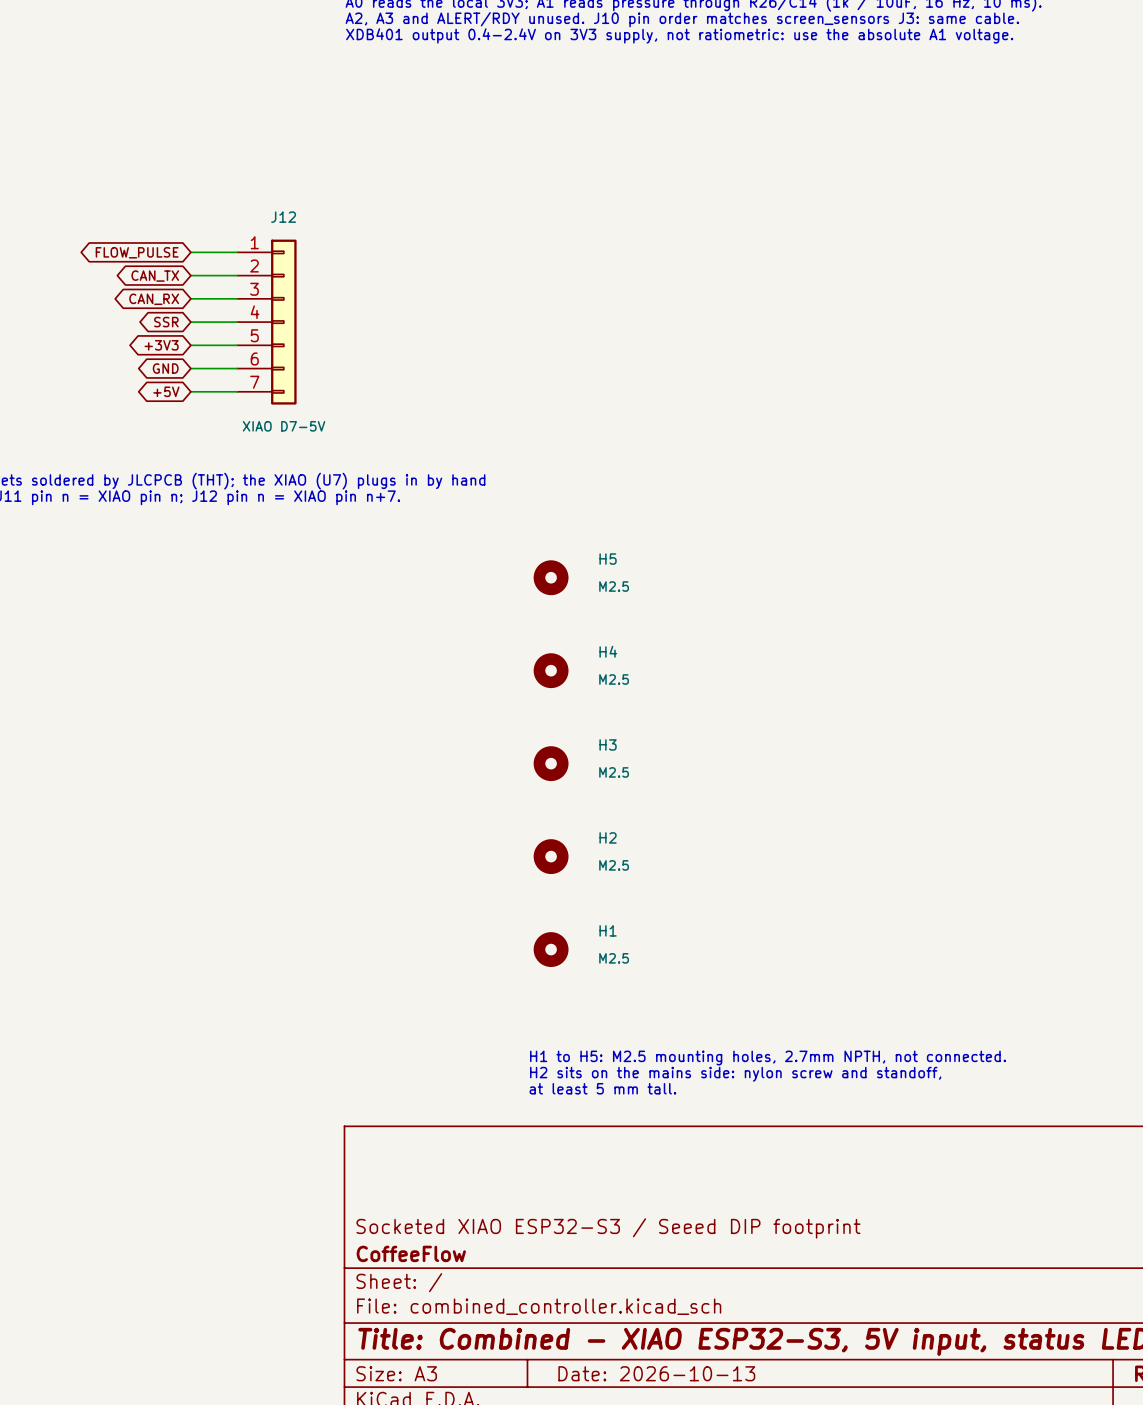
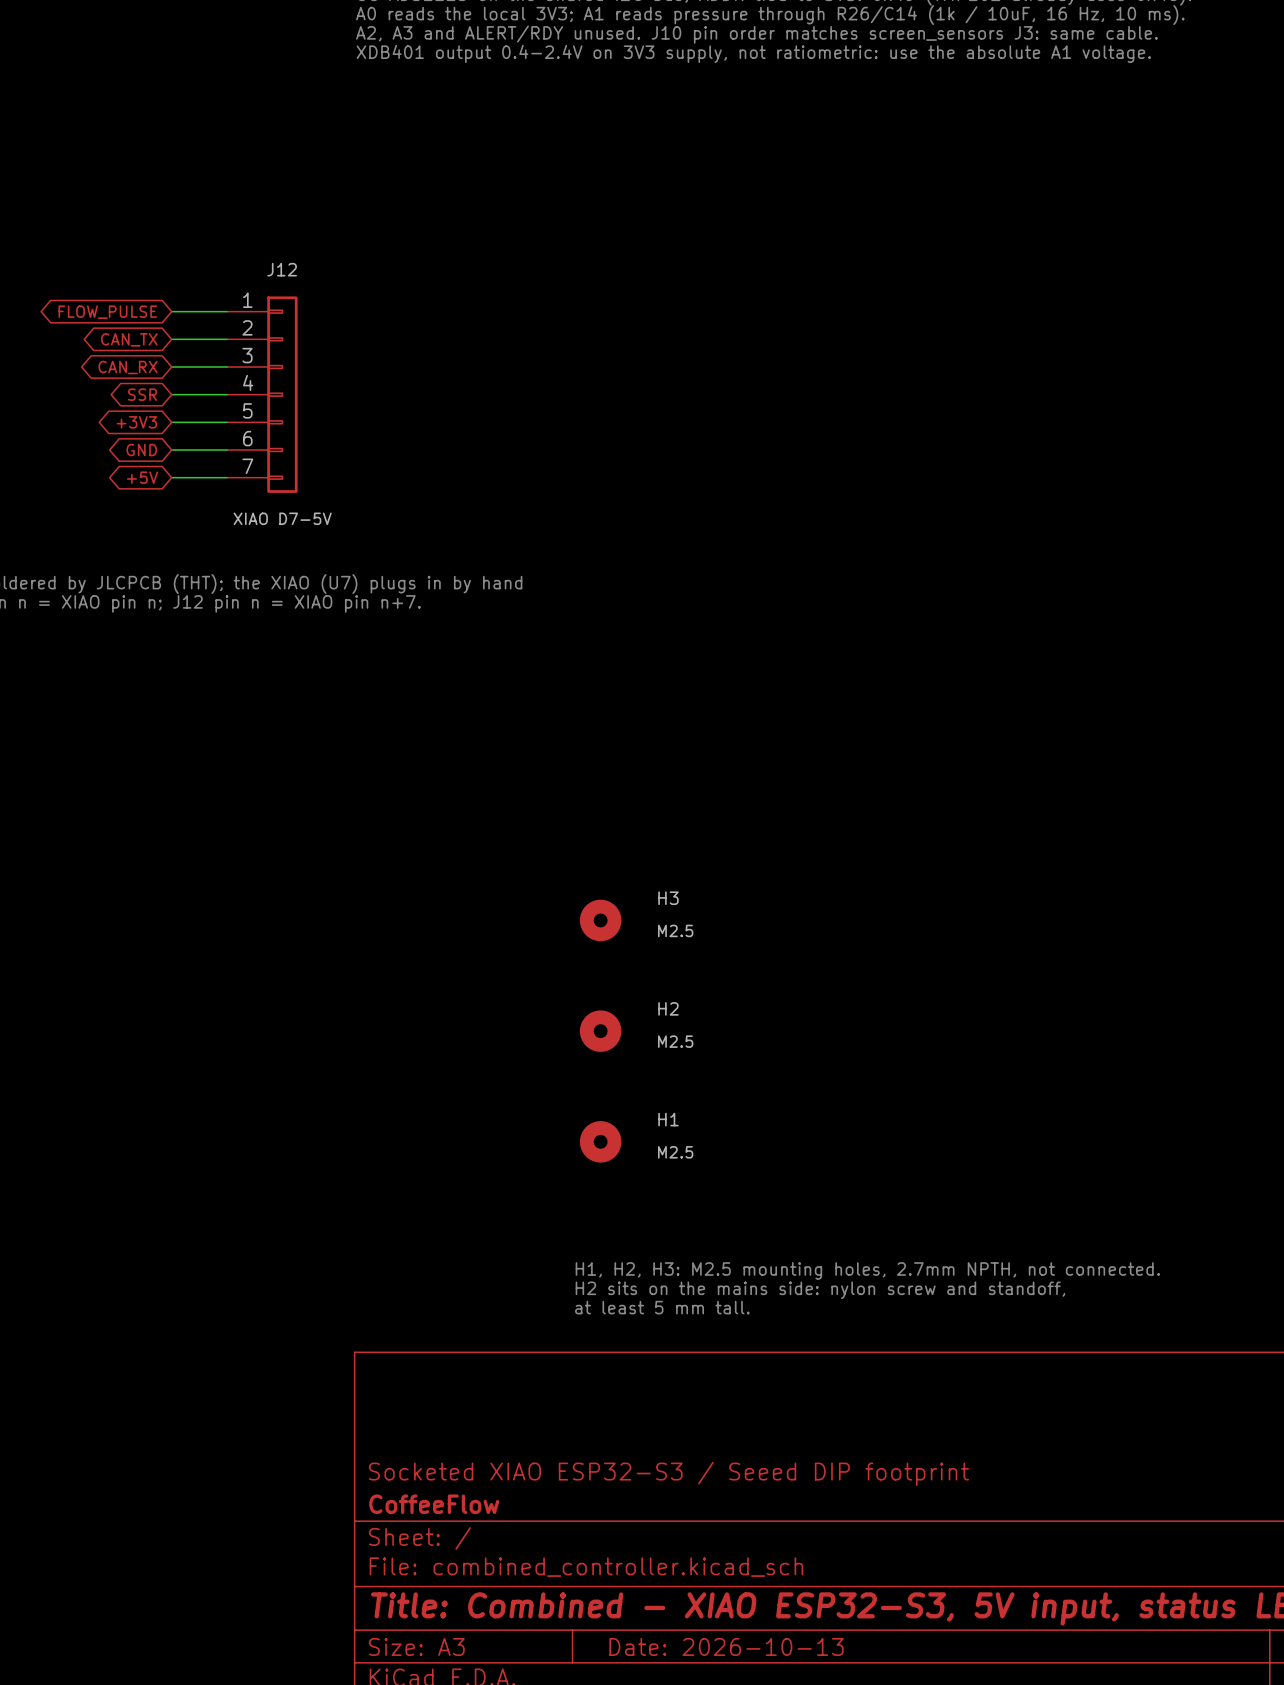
H5: M2.5 (551, 577) -> none
H4: M2.5 (551, 670) -> none
text: H1 to H5: M2.5 mounting holes, 2.7mm NPTH, not connected. (768, 1058) -> H1, H2, H3: M2.5 mounting holes, 2.7mm NPTH, not connected. (867, 1271)

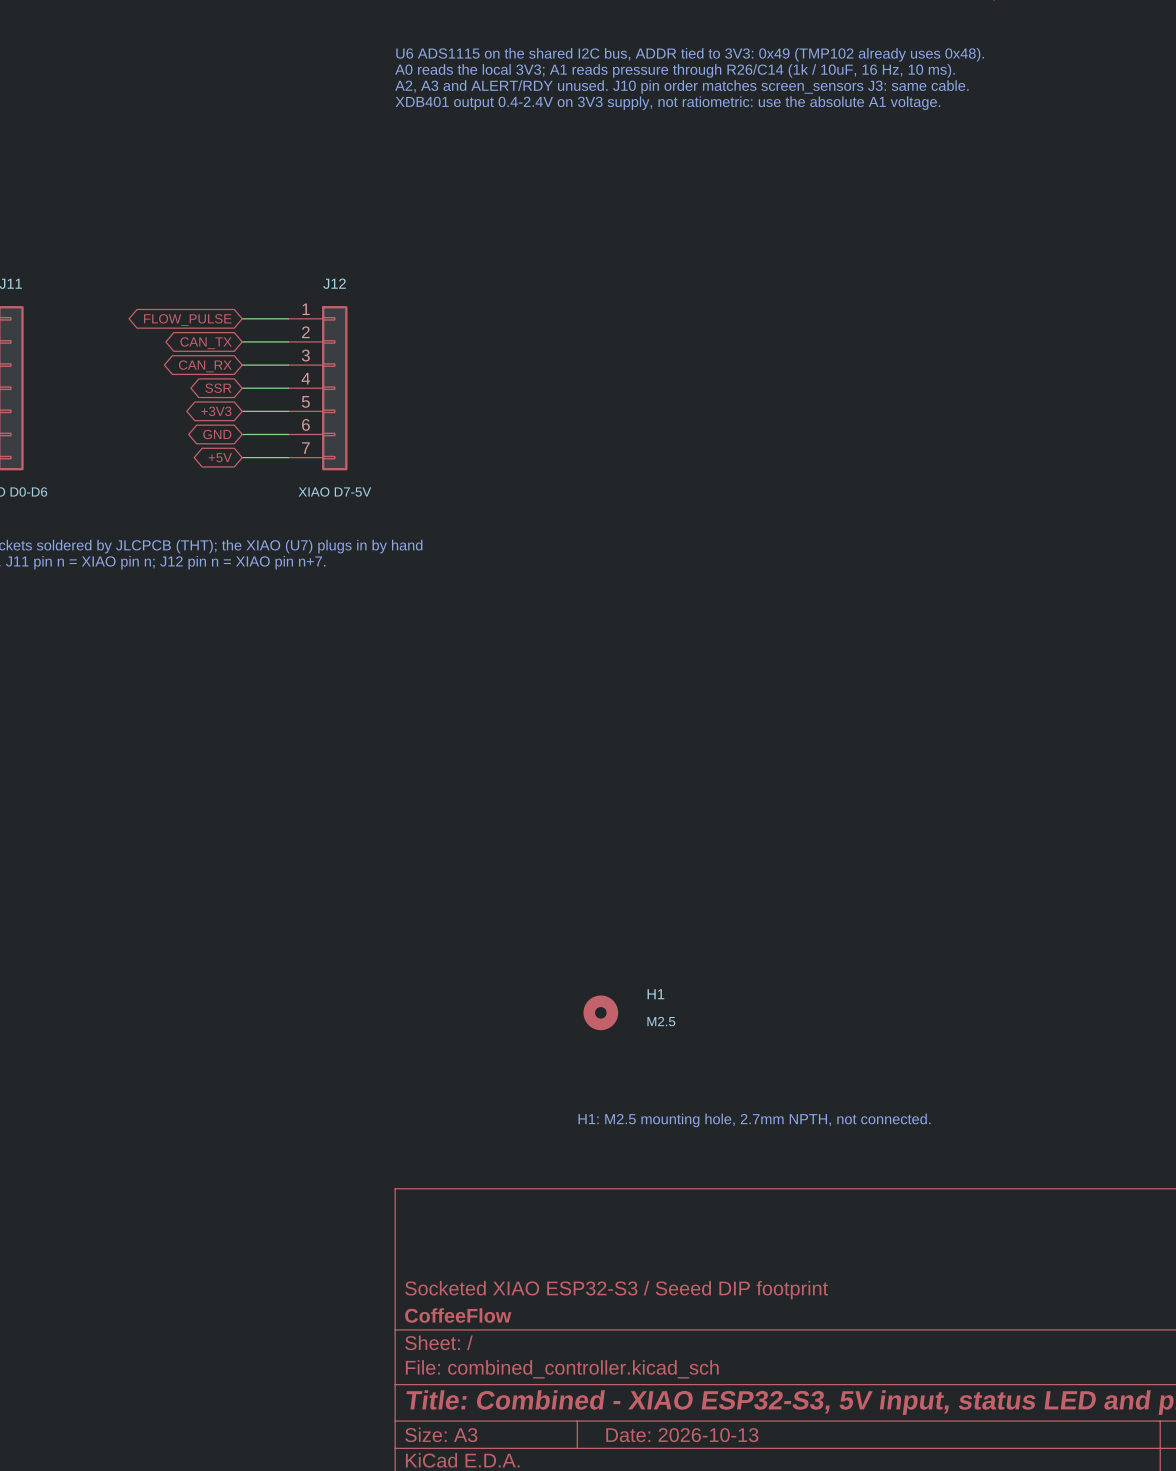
H3: M2.5 (600, 920) -> none
H2: M2.5 (600, 1031) -> none
text: H1, H2, H3: M2.5 mounting holes, 2.7mm NPTH, not connected. (867, 1271) -> H1: M2.5 mounting hole, 2.7mm NPTH, not connected. (754, 1120)
text: H2 sits on the mains side: nylon screw and standoff, (820, 1290) -> none
text: at least 5 mm tall. (662, 1307) -> none

